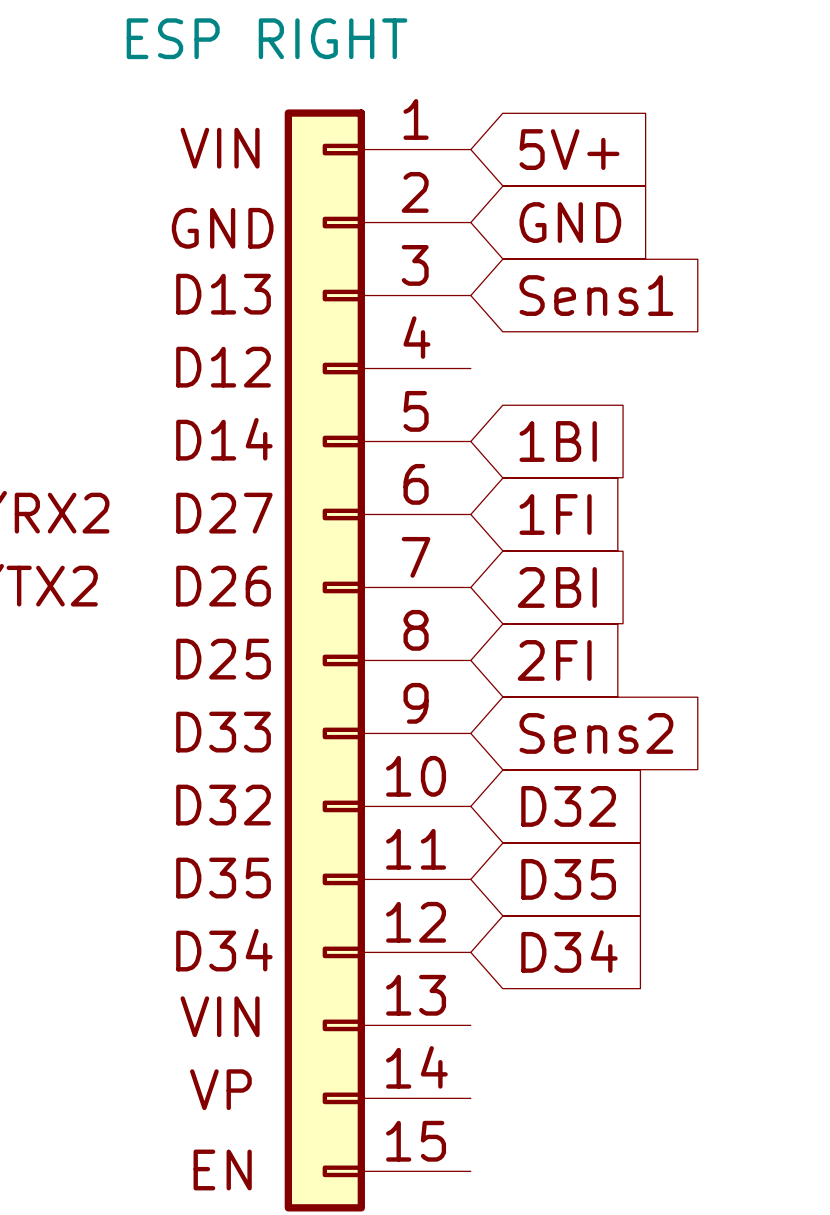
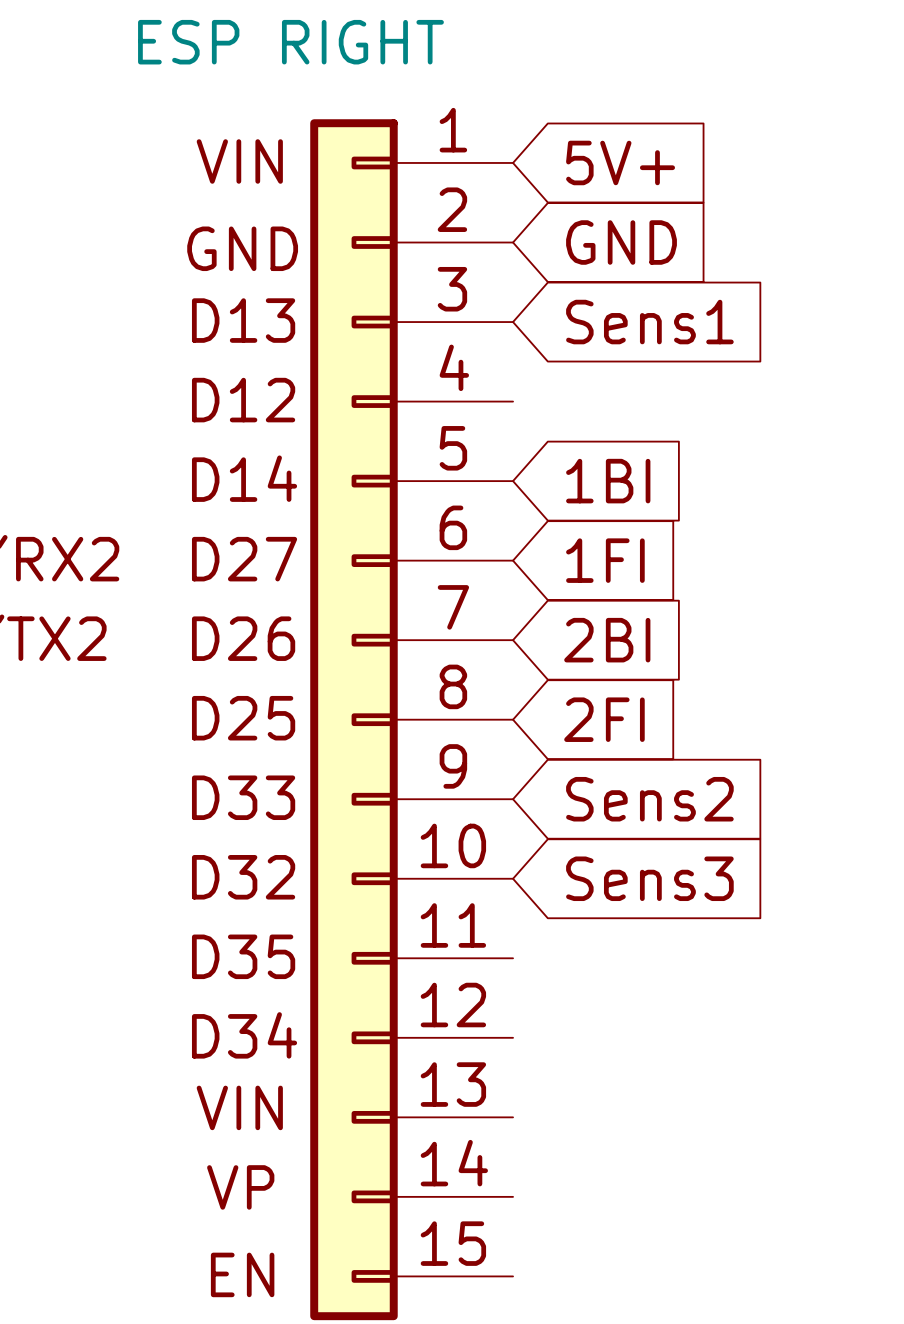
global label: D32 (568, 806) -> Sens3 (649, 878)
global label: D35 (568, 879) -> none
global label: D34 (569, 951) -> none

